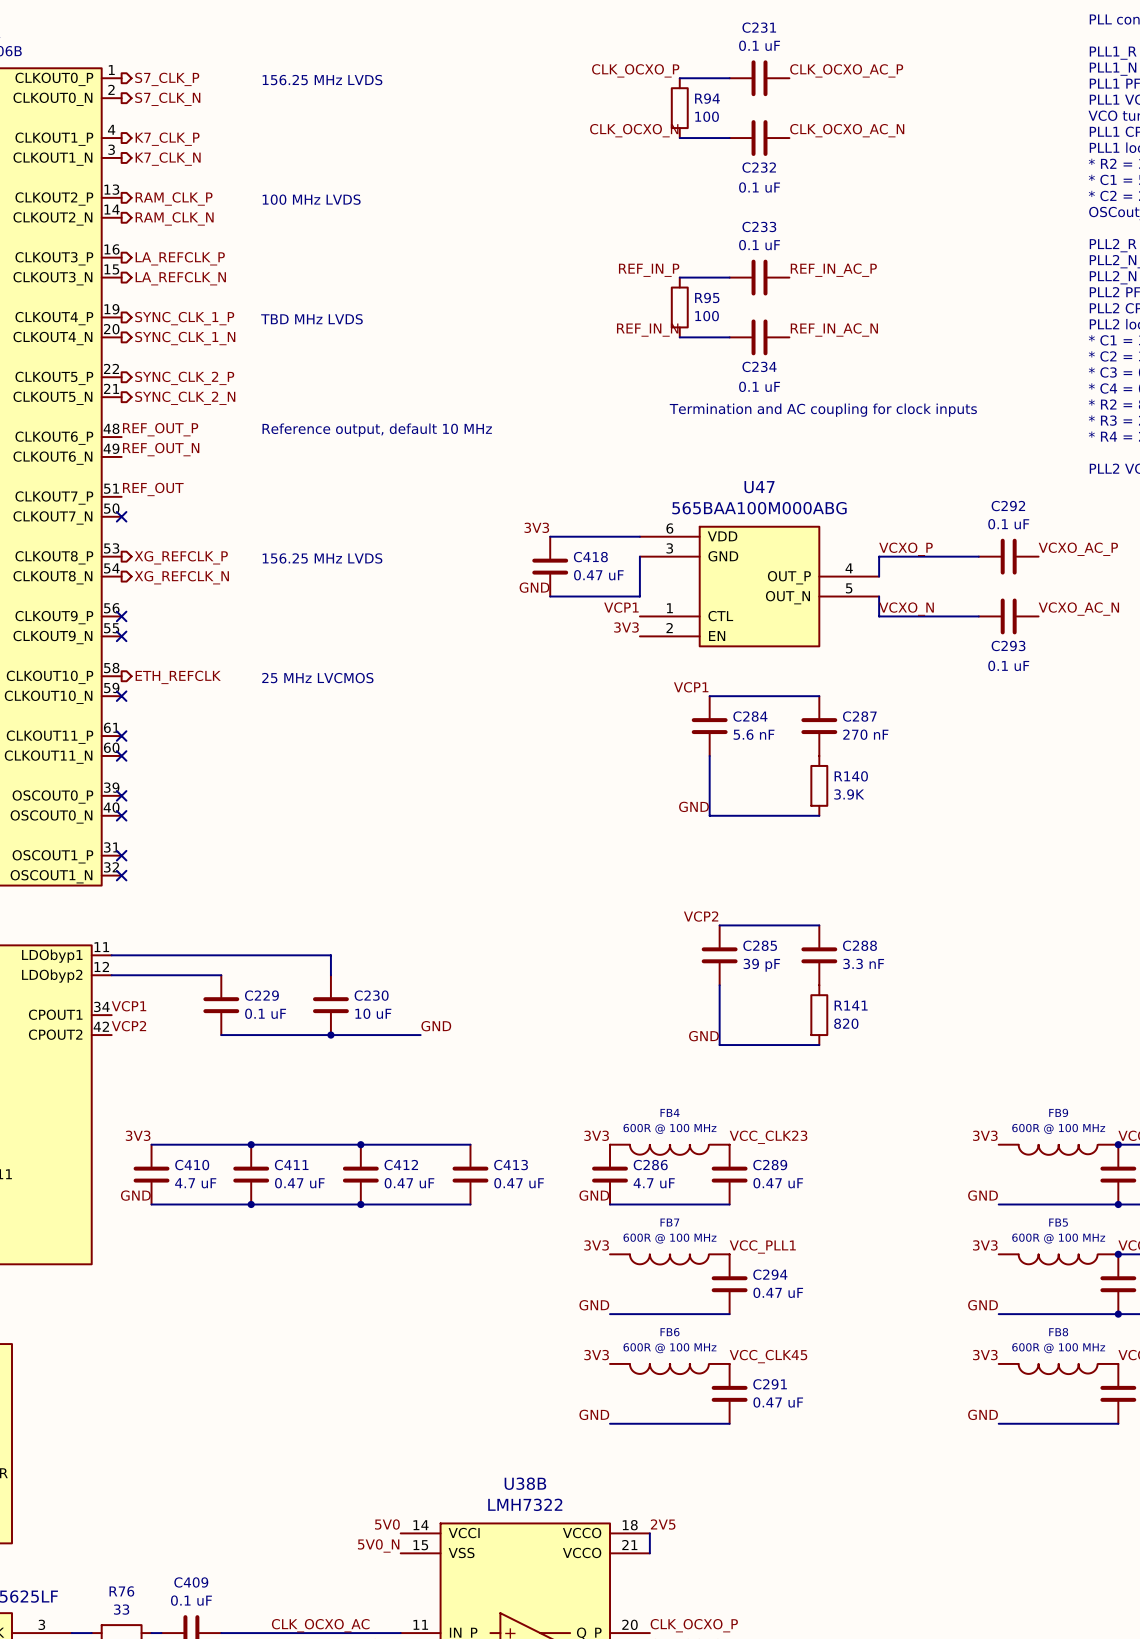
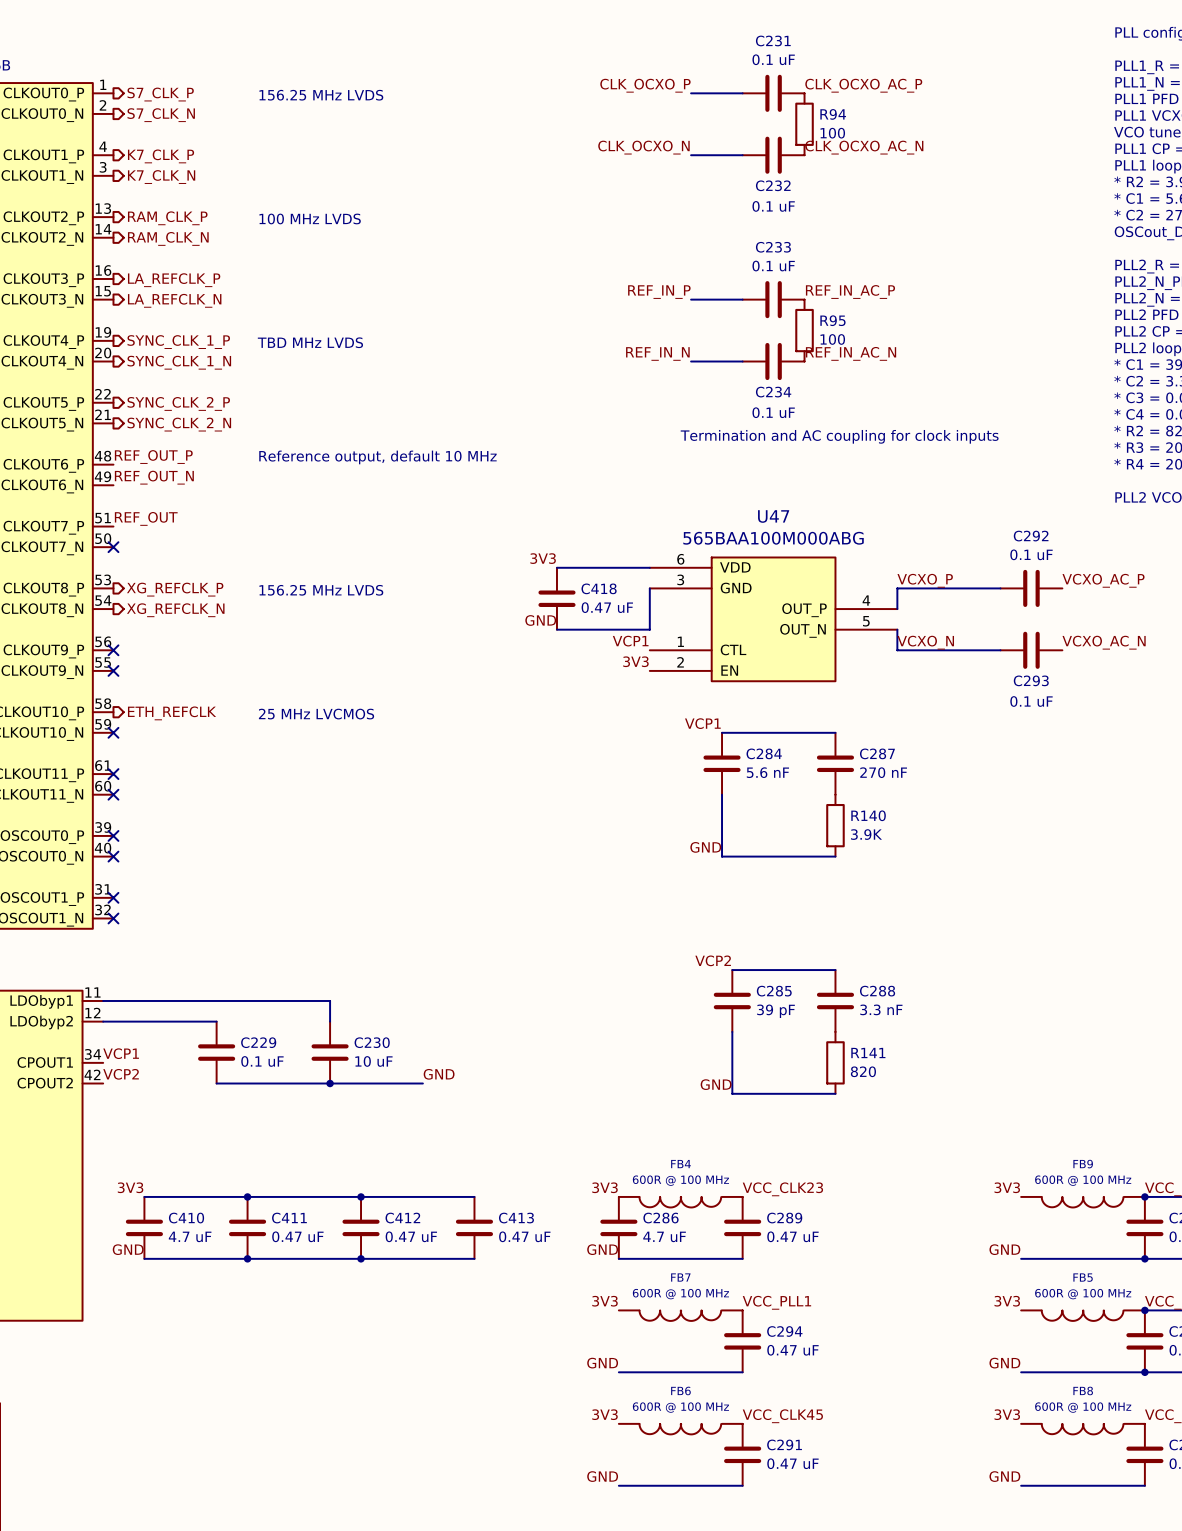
R94 position: (679, 108) -> (804, 124)
R95 position: (679, 307) -> (804, 330)

